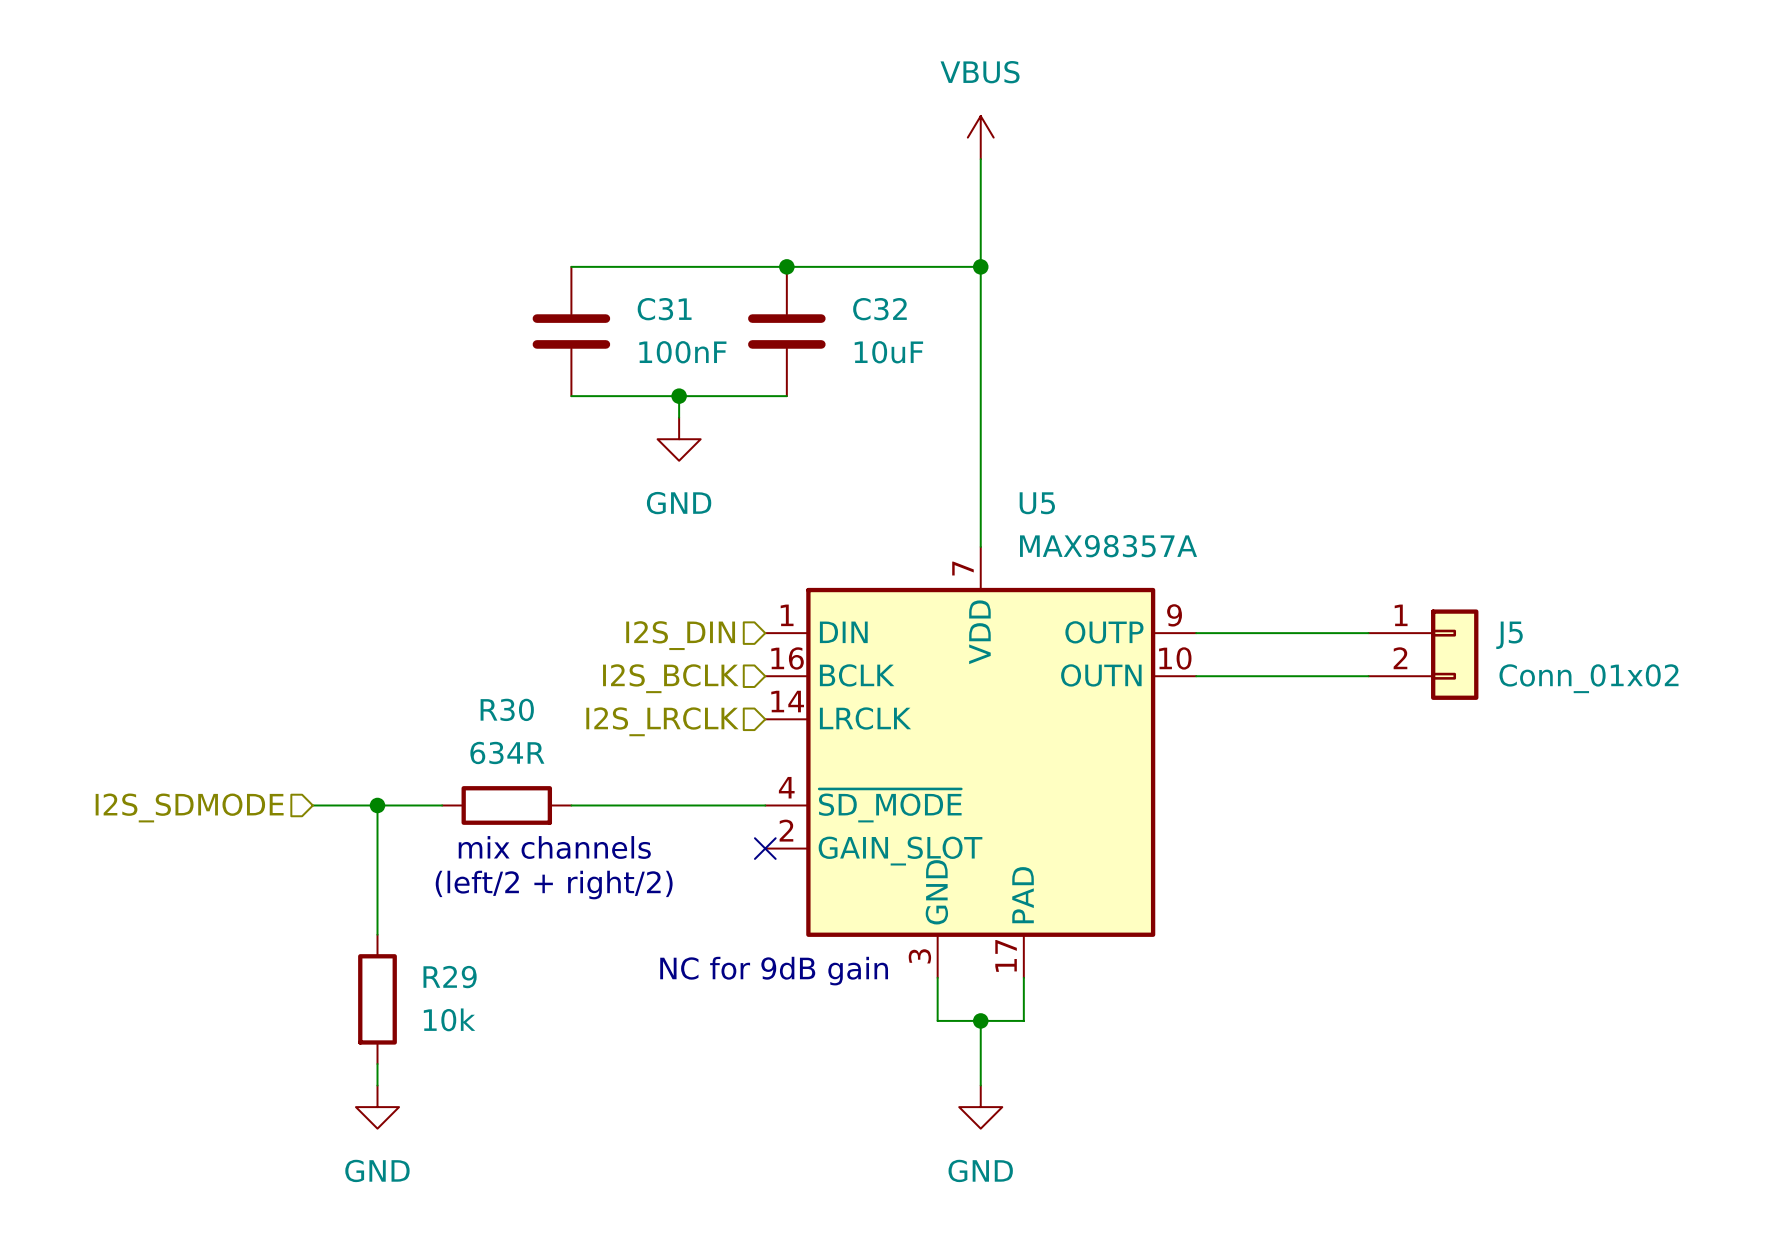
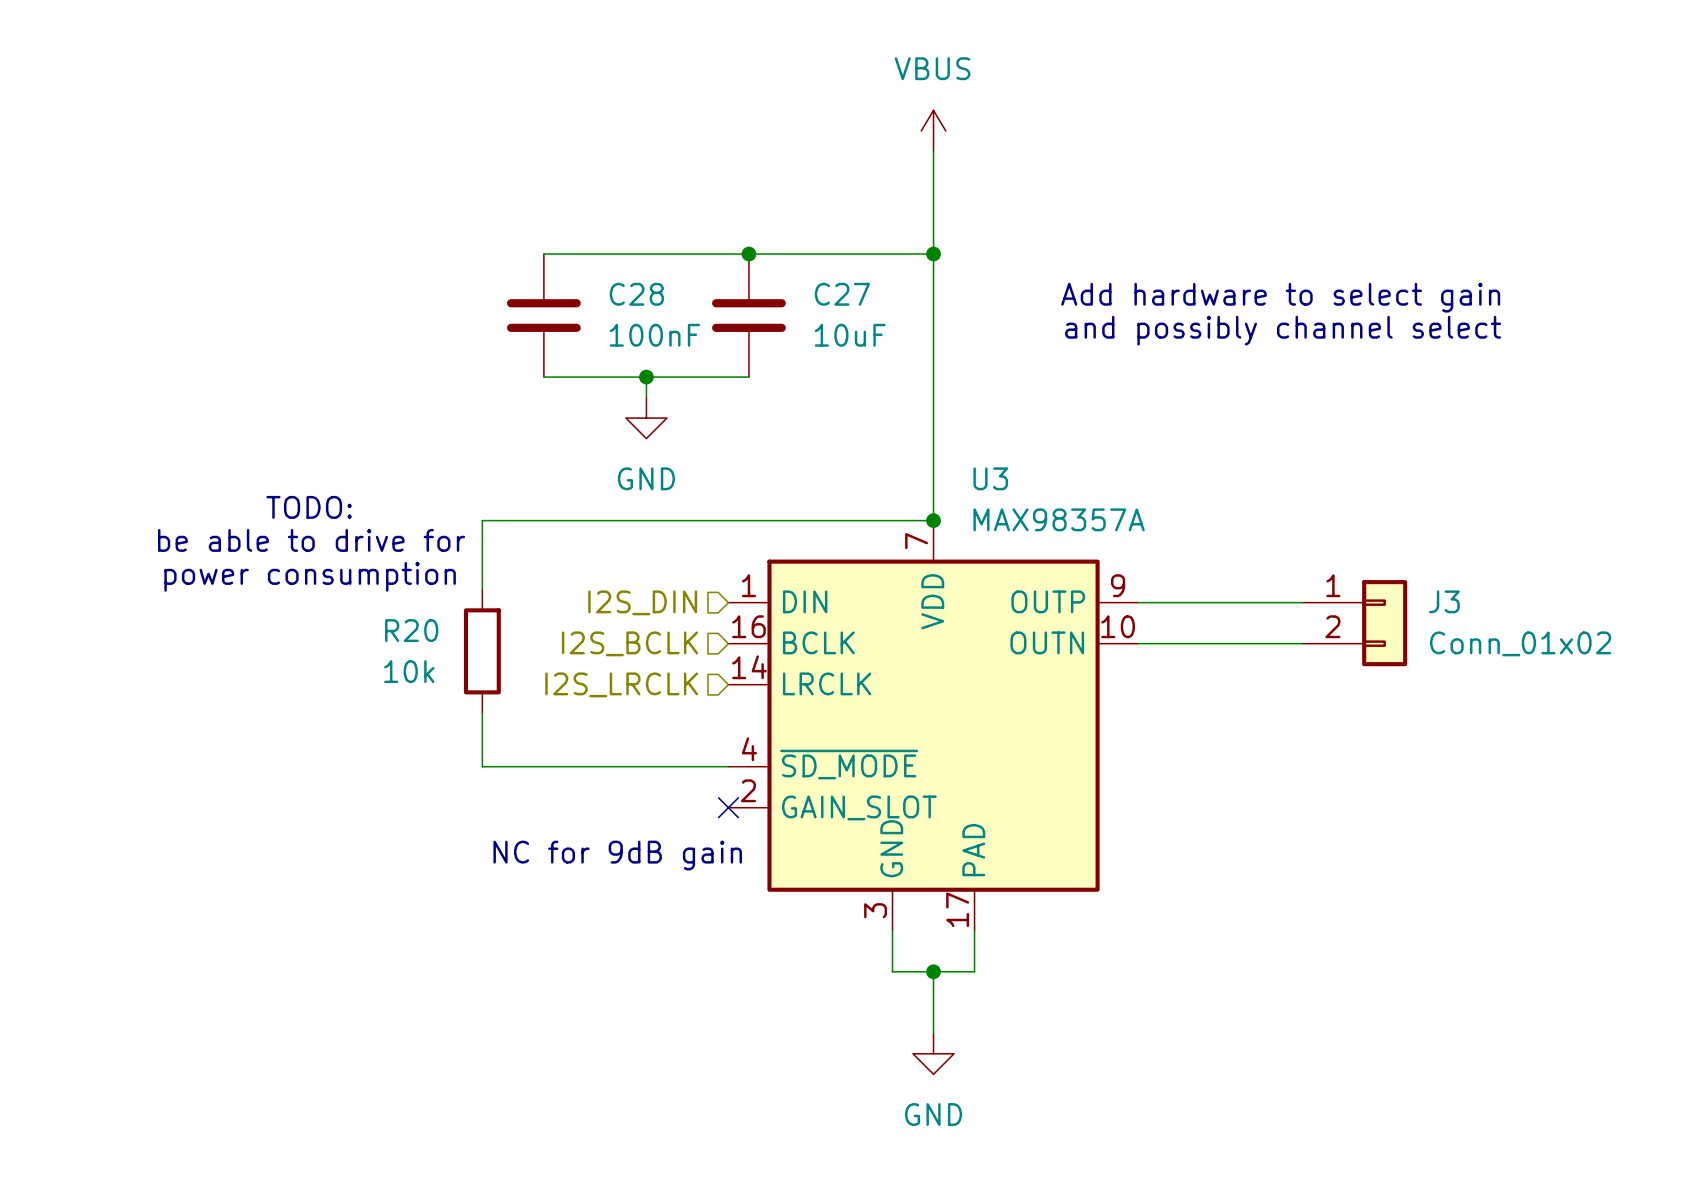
C31 name: C31 (664, 309) -> C28 (636, 294)
C32 name: C32 (879, 309) -> C27 (842, 294)
text: none -> Add hardware to select gain (1280, 297)
text: none -> and possibly channel select (1283, 330)
U5 name: U5 (1037, 503) -> U3 (990, 478)
text: none -> TODO: (309, 507)
wire: none -> (933, 520) (482, 520) (482, 589)
junction: none -> (933, 520)
text: none -> be able to drive for (311, 540)
text: none -> power consumption (310, 576)
J5 name: J5 (1509, 635) -> J3 (1444, 601)
R20: none -> 10k (482, 651)
wire: none -> (482, 712) (482, 766) (543, 766)
wire: (312, 805) (442, 805) -> none
wire: (377, 805) (377, 934) -> none
junction: (377, 805) -> none
R30: 634R (506, 805) -> none
hierarchical label: I2S_SDMODE (189, 807) -> none
text: mix channels (554, 847) -> none
text: (left/2 + right/2) (554, 885) -> none
text position: NC for 9dB gain (774, 971) -> NC for 9dB gain (617, 855)
R29: 10k (377, 999) -> none
wire: (377, 1064) (377, 1085) -> none
power symbol: GND (377, 1107) -> none

